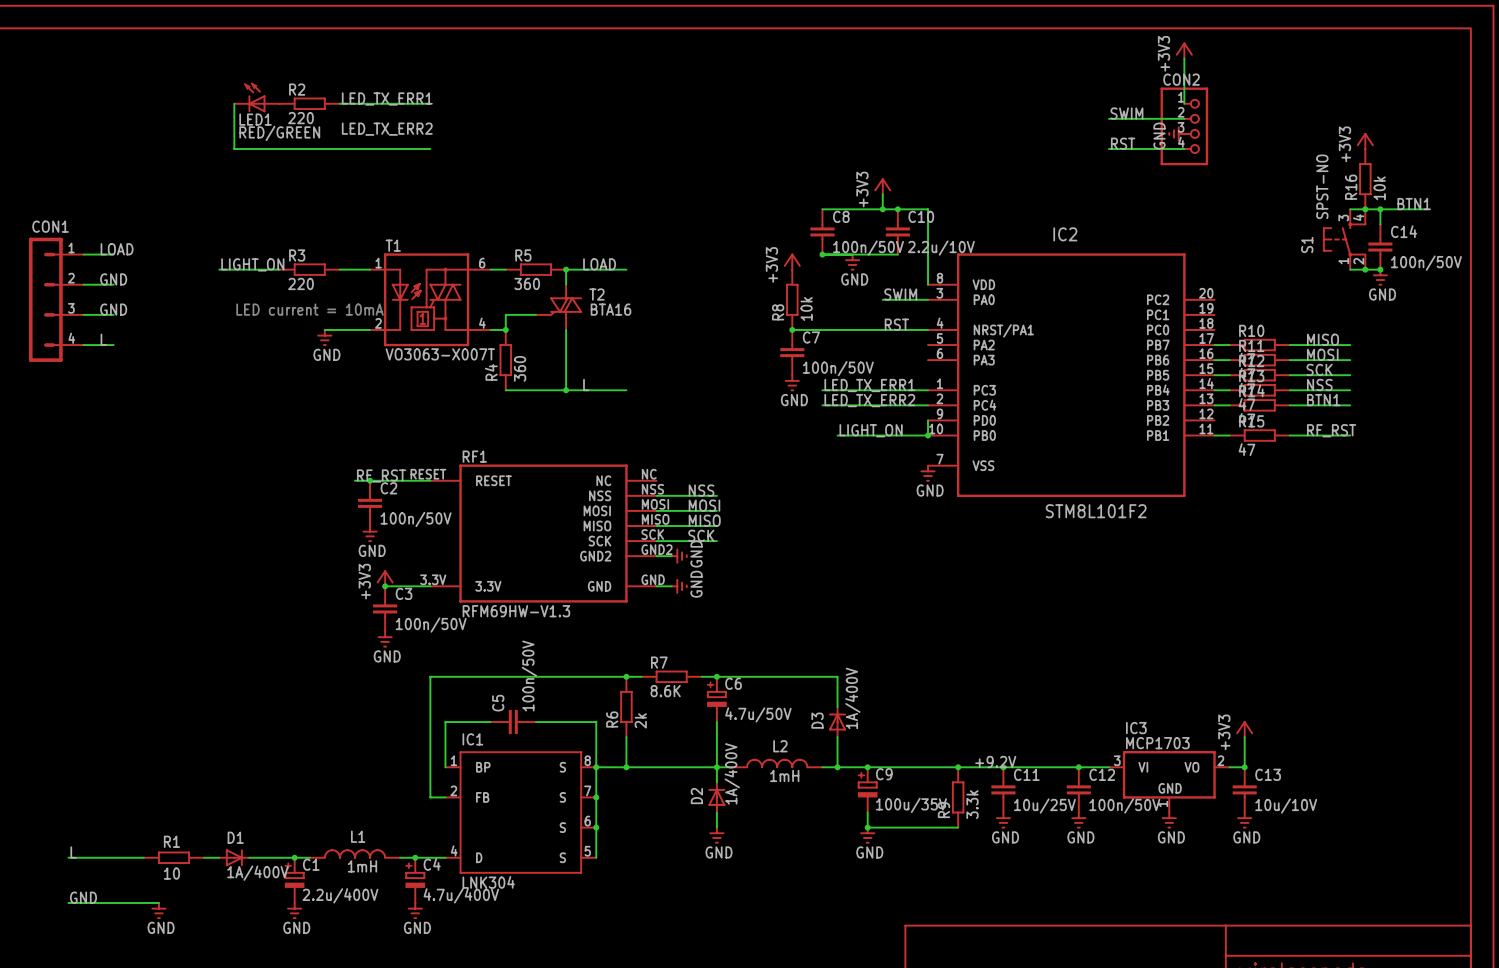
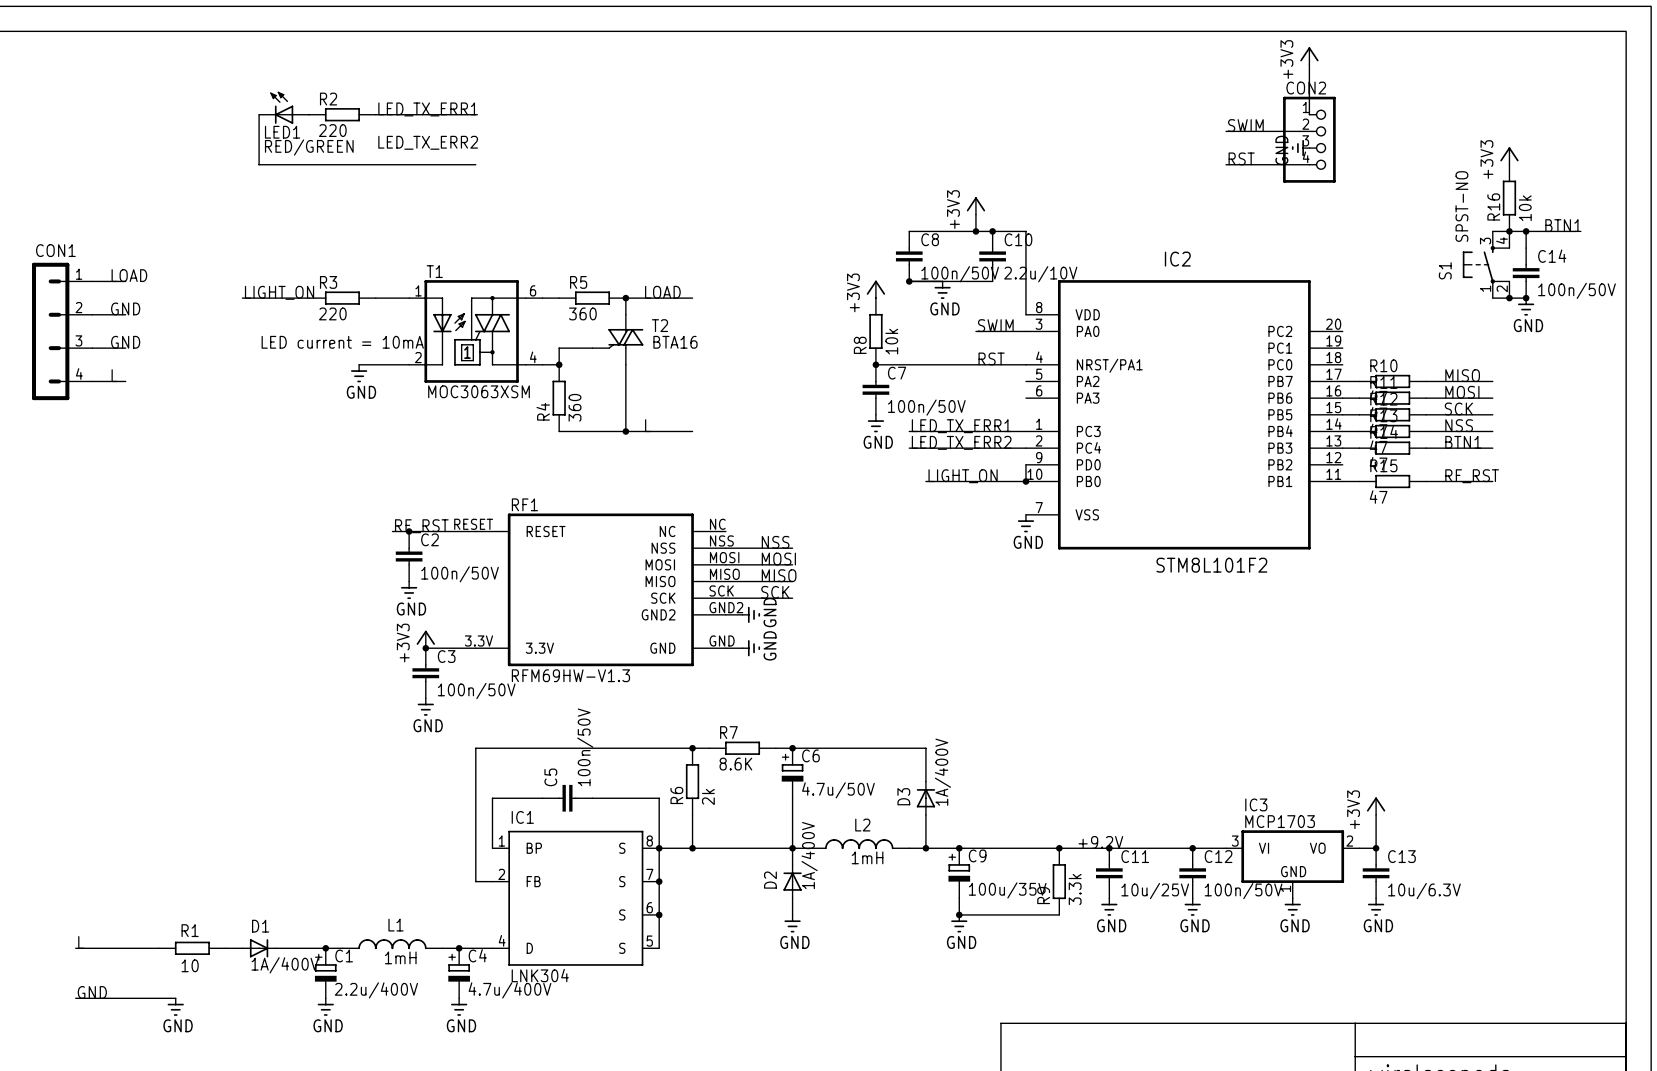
T1 value: VO3063-X007T (440, 354) -> MOC3063XSM (479, 391)
C13 value: 10u/10V (1286, 805) -> 10u/6.3V (1424, 891)

